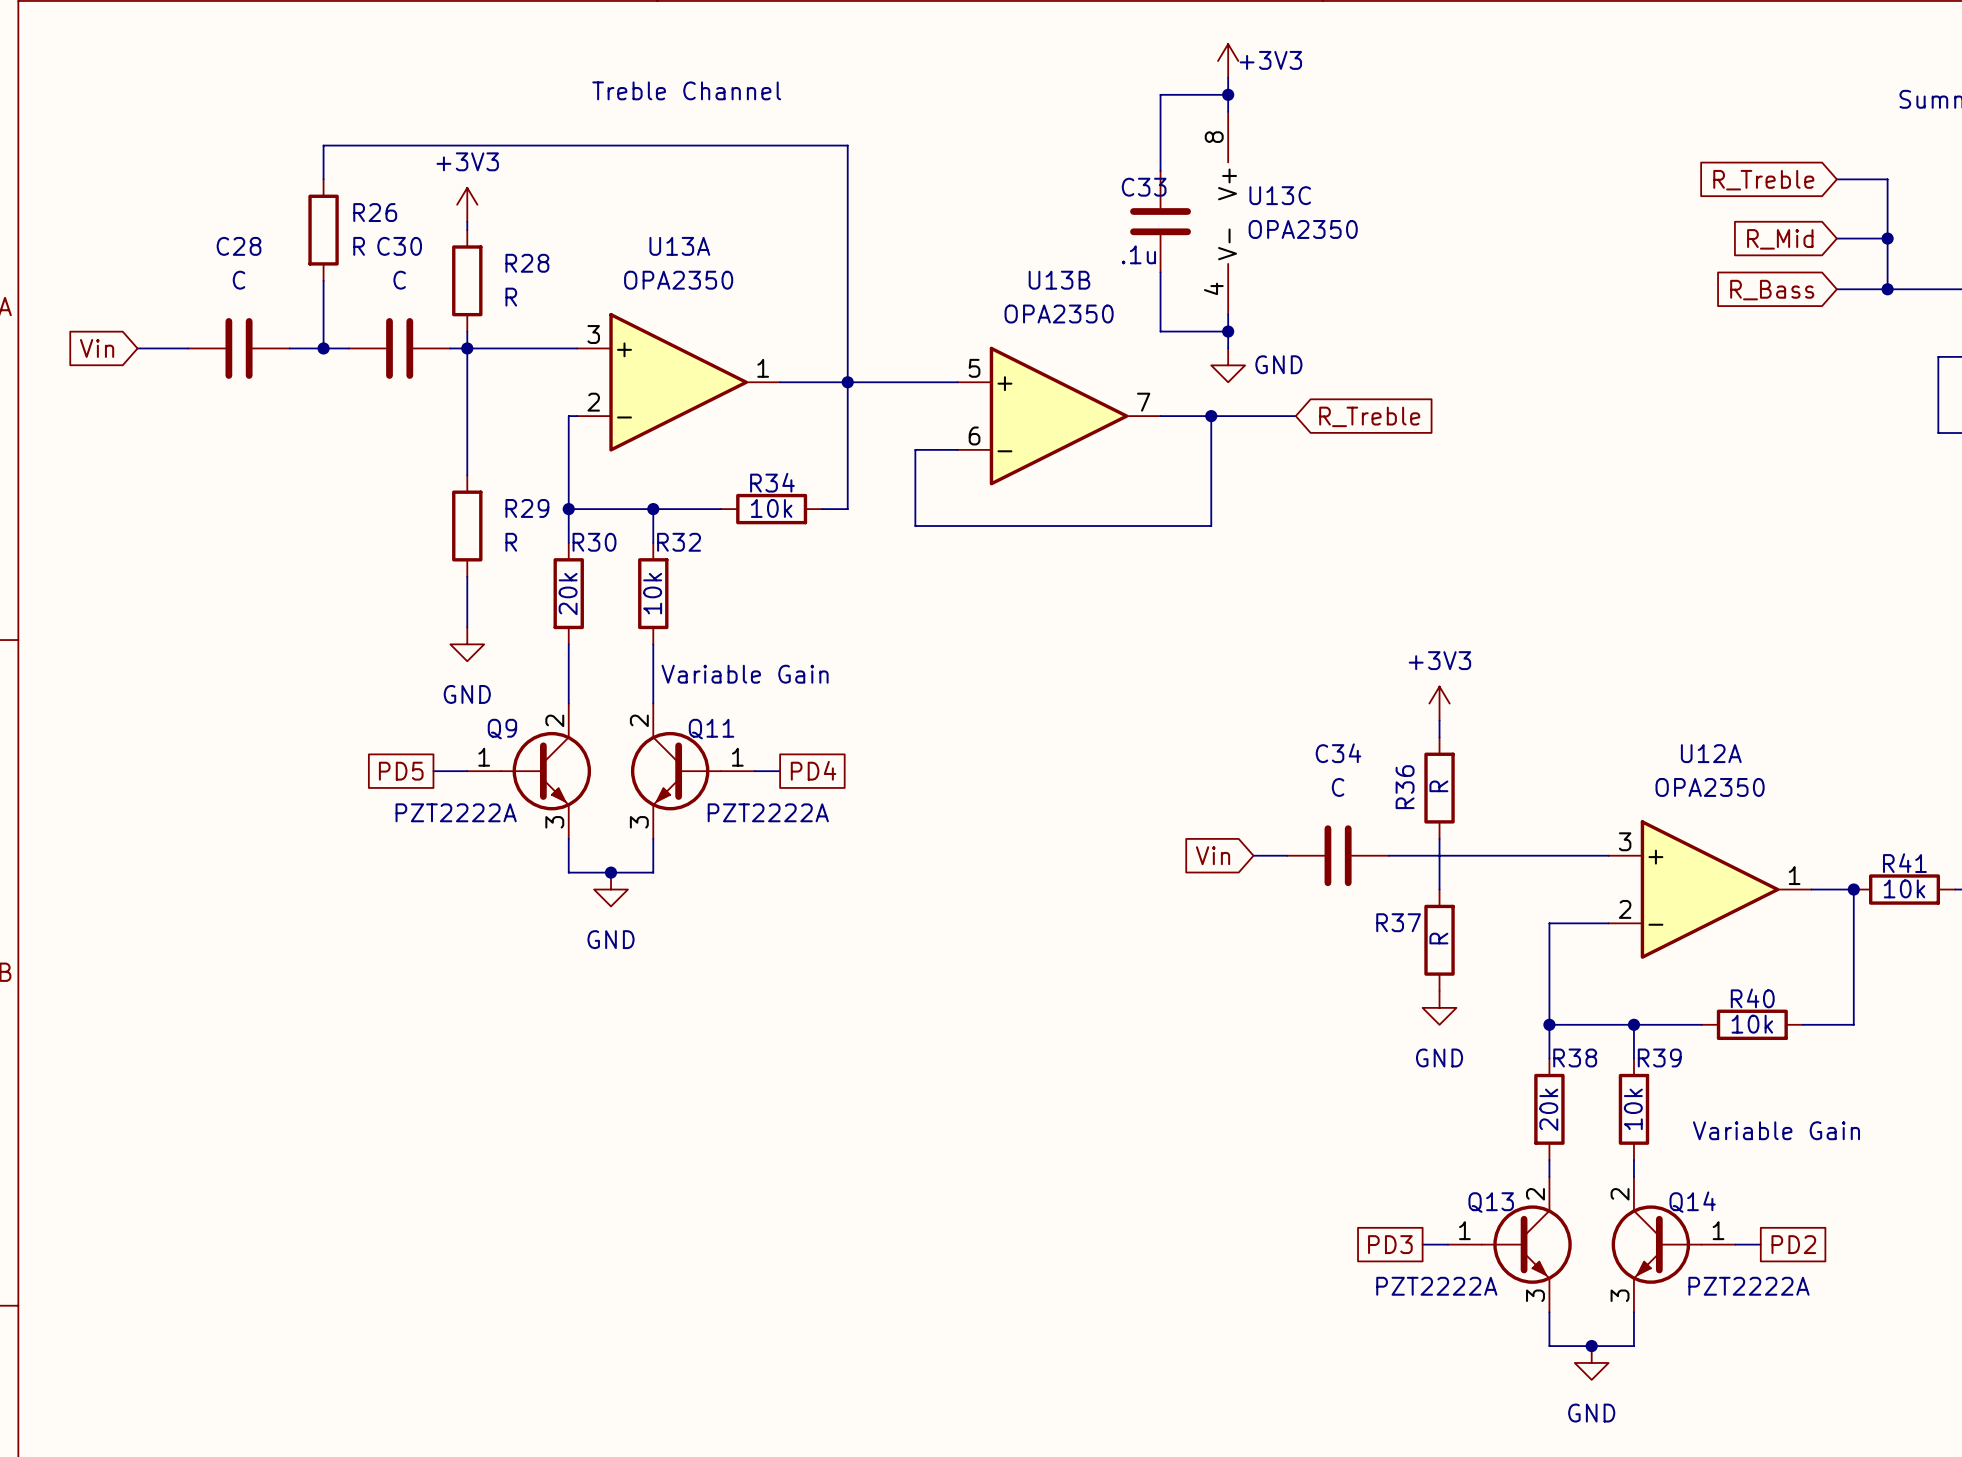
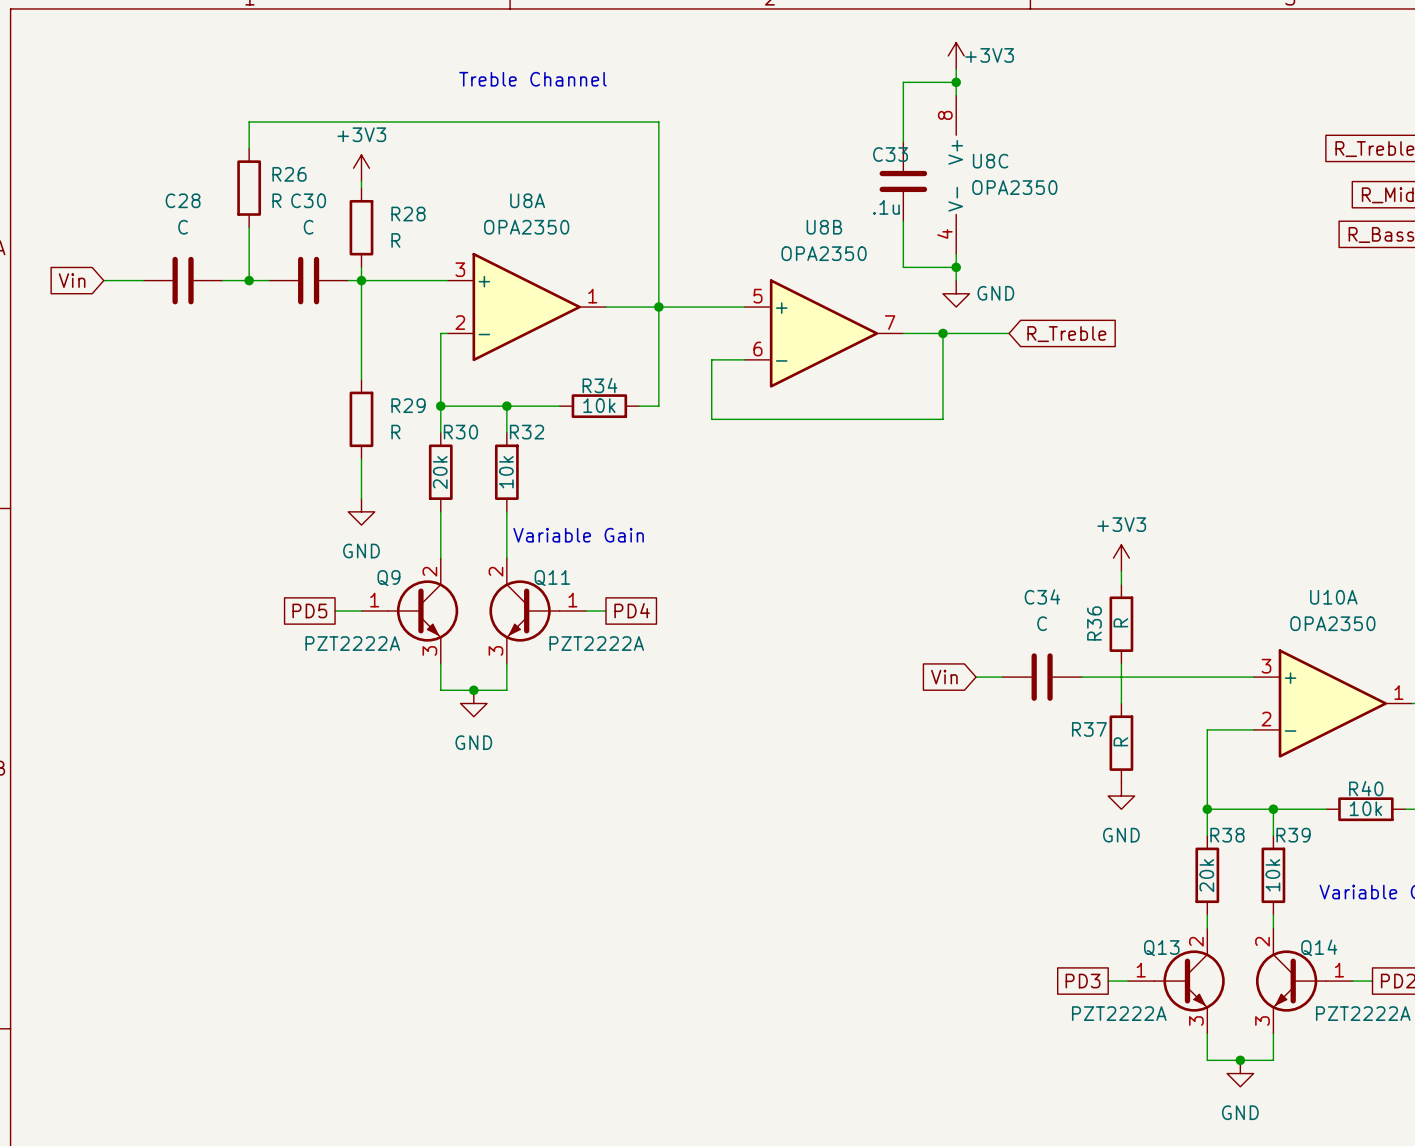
U13C name: U13C (1280, 195) -> U8C (990, 161)
U13A name: U13A (679, 246) -> U8A (527, 200)
U13B name: U13B (1059, 280) -> U8B (824, 227)
U12A name: U12A (1711, 753) -> U10A (1333, 597)

